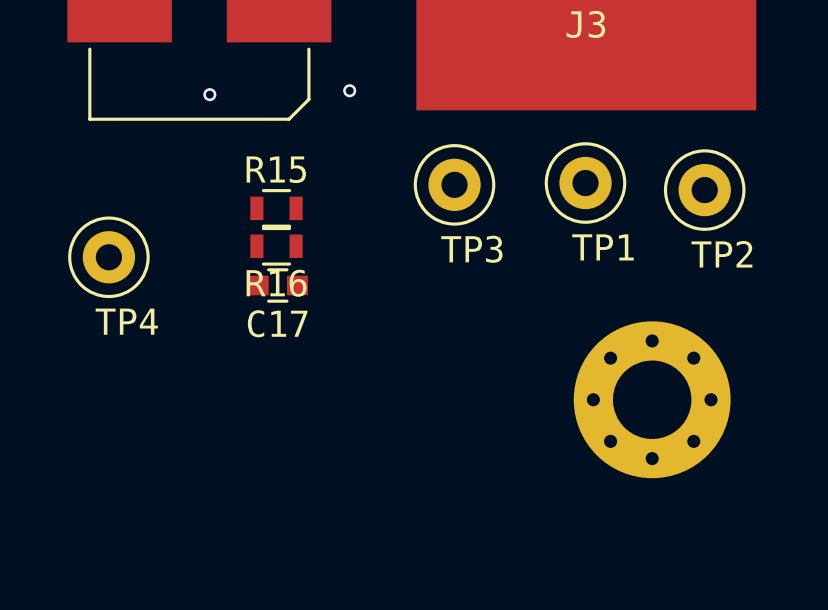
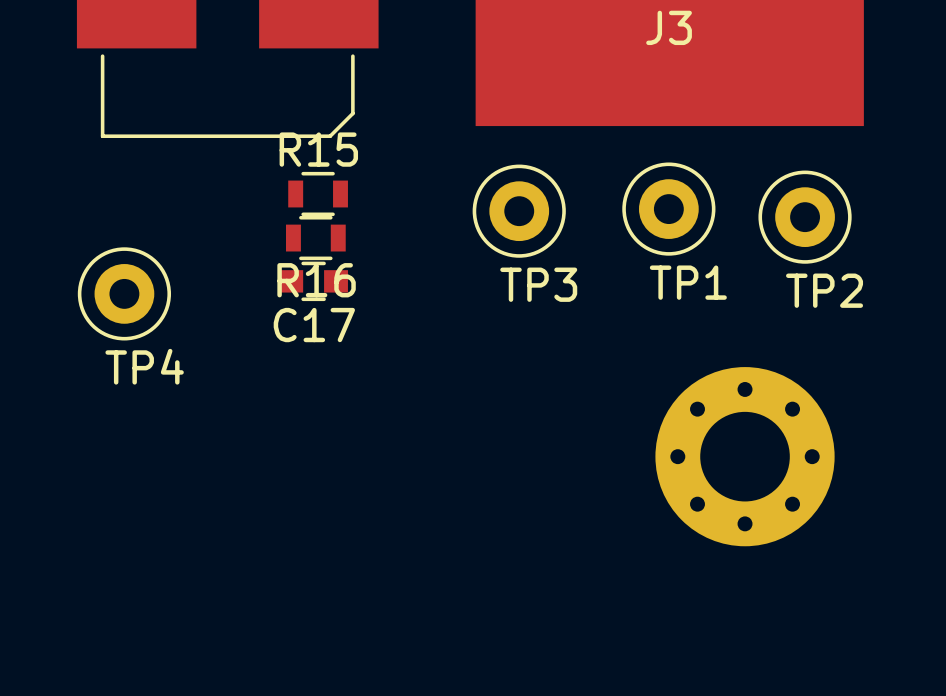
via: (349, 90) -> none
via: (209, 94) -> none
R15 name: R15 (276, 169) -> R16 (316, 280)
R15: none -> (318, 194)
R16: (276, 246) -> none
C17 position: (277, 285) -> (313, 281)

